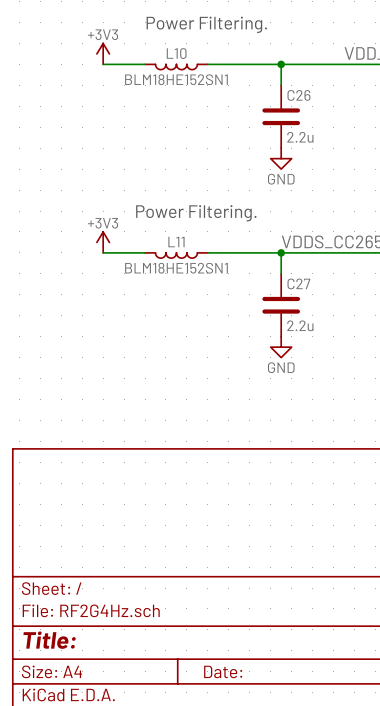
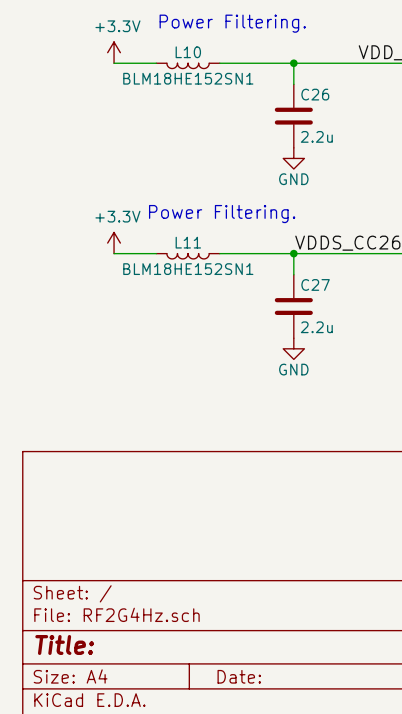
power symbol: +3V3 (103, 53) -> +3.3V (114, 52)
power symbol: +3V3 (103, 242) -> +3.3V (114, 243)

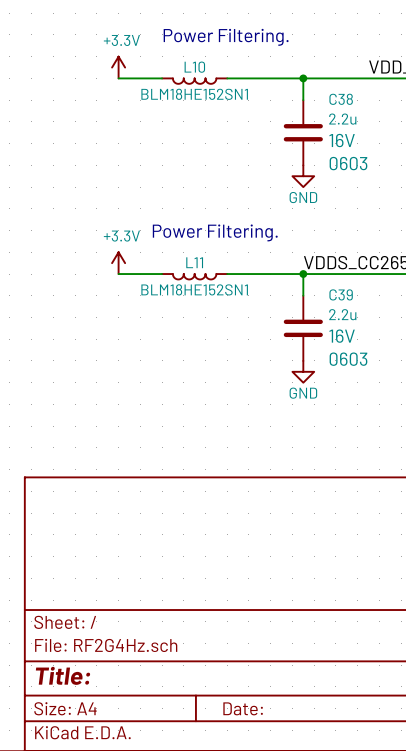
C26 name: C26 (315, 94) -> C38 (341, 99)
C26 text: none -> 16V (342, 140)
C26 value position: 2.2u (316, 136) -> 2.2u (342, 119)
C26 text: none -> 0603 (348, 163)
C27 name: C27 (315, 284) -> C39 (341, 294)
C27 text: none -> 16V (342, 336)
C27 value position: 2.2u (316, 327) -> 2.2u (342, 314)
C27 text: none -> 0603 (348, 359)

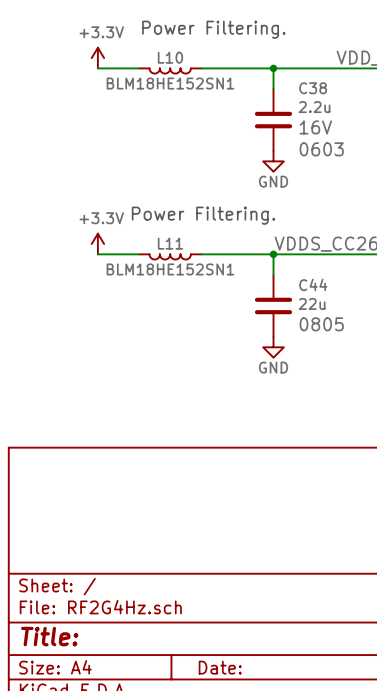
C39 name: C39 (341, 294) -> C44 (313, 284)
C39 value: 2.2u (342, 314) -> 22u (312, 303)
C39 text: 16V (342, 336) -> none
C39 text: 0603 (348, 359) -> 0805 (321, 324)

